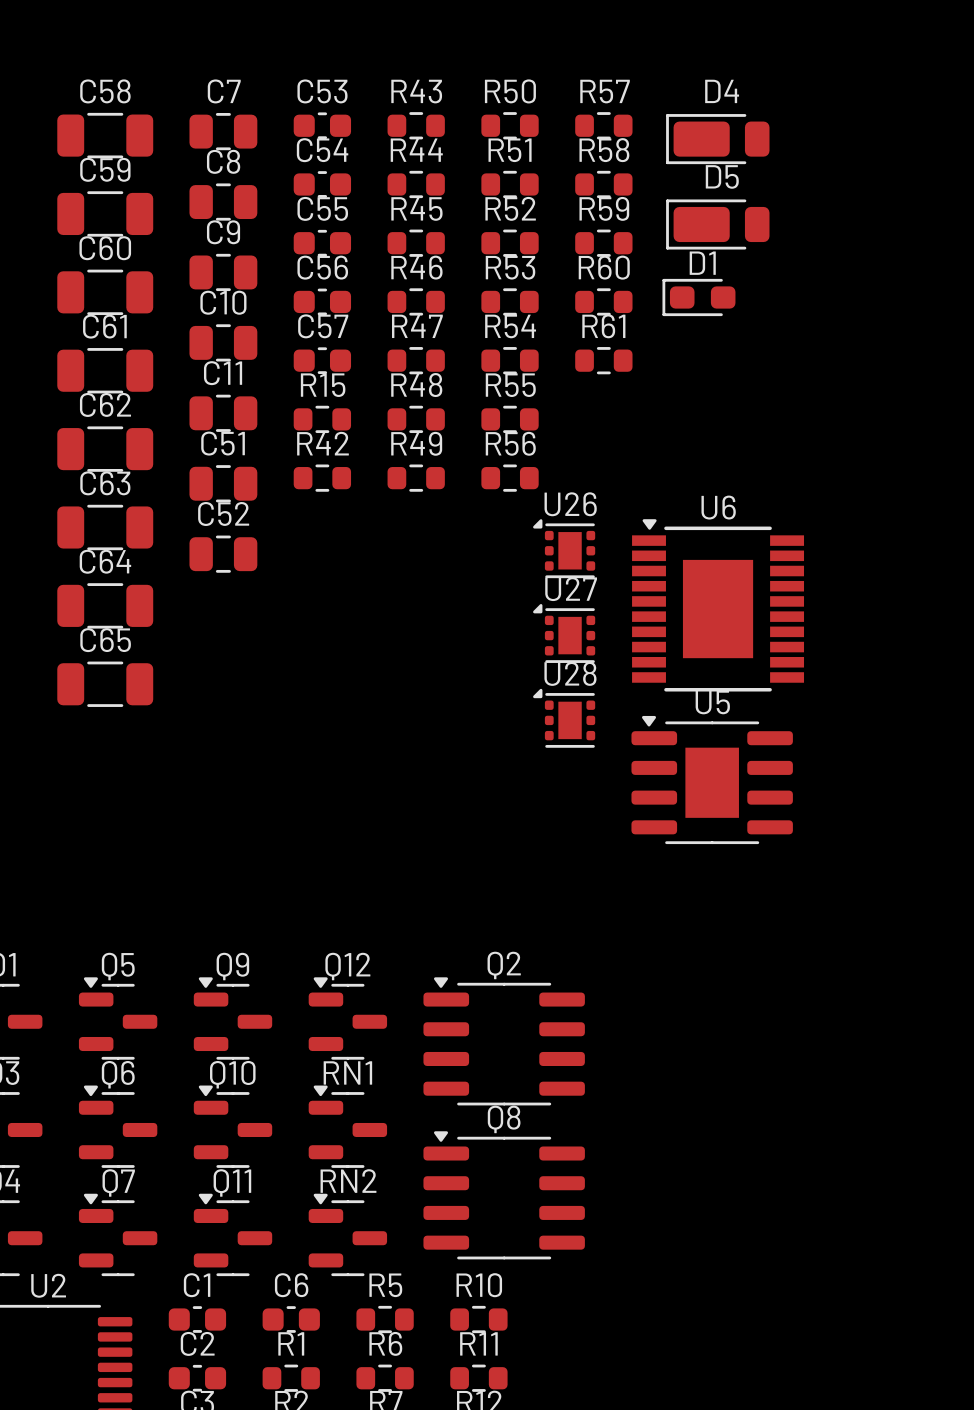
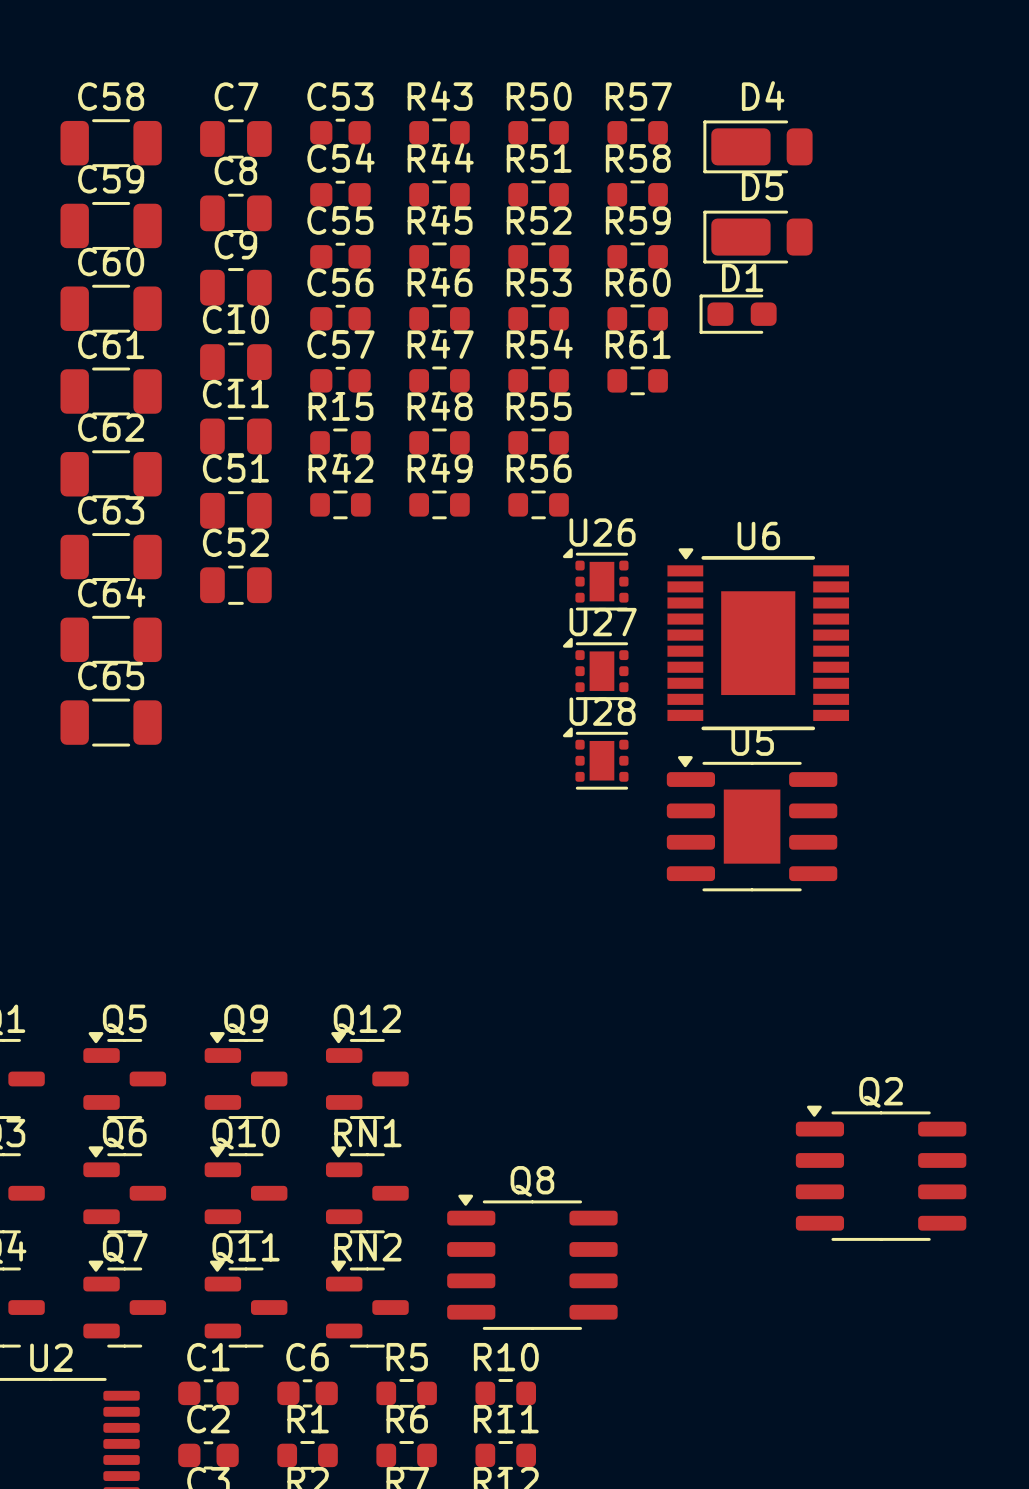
Q2 position: (504, 1041) -> (881, 1173)

